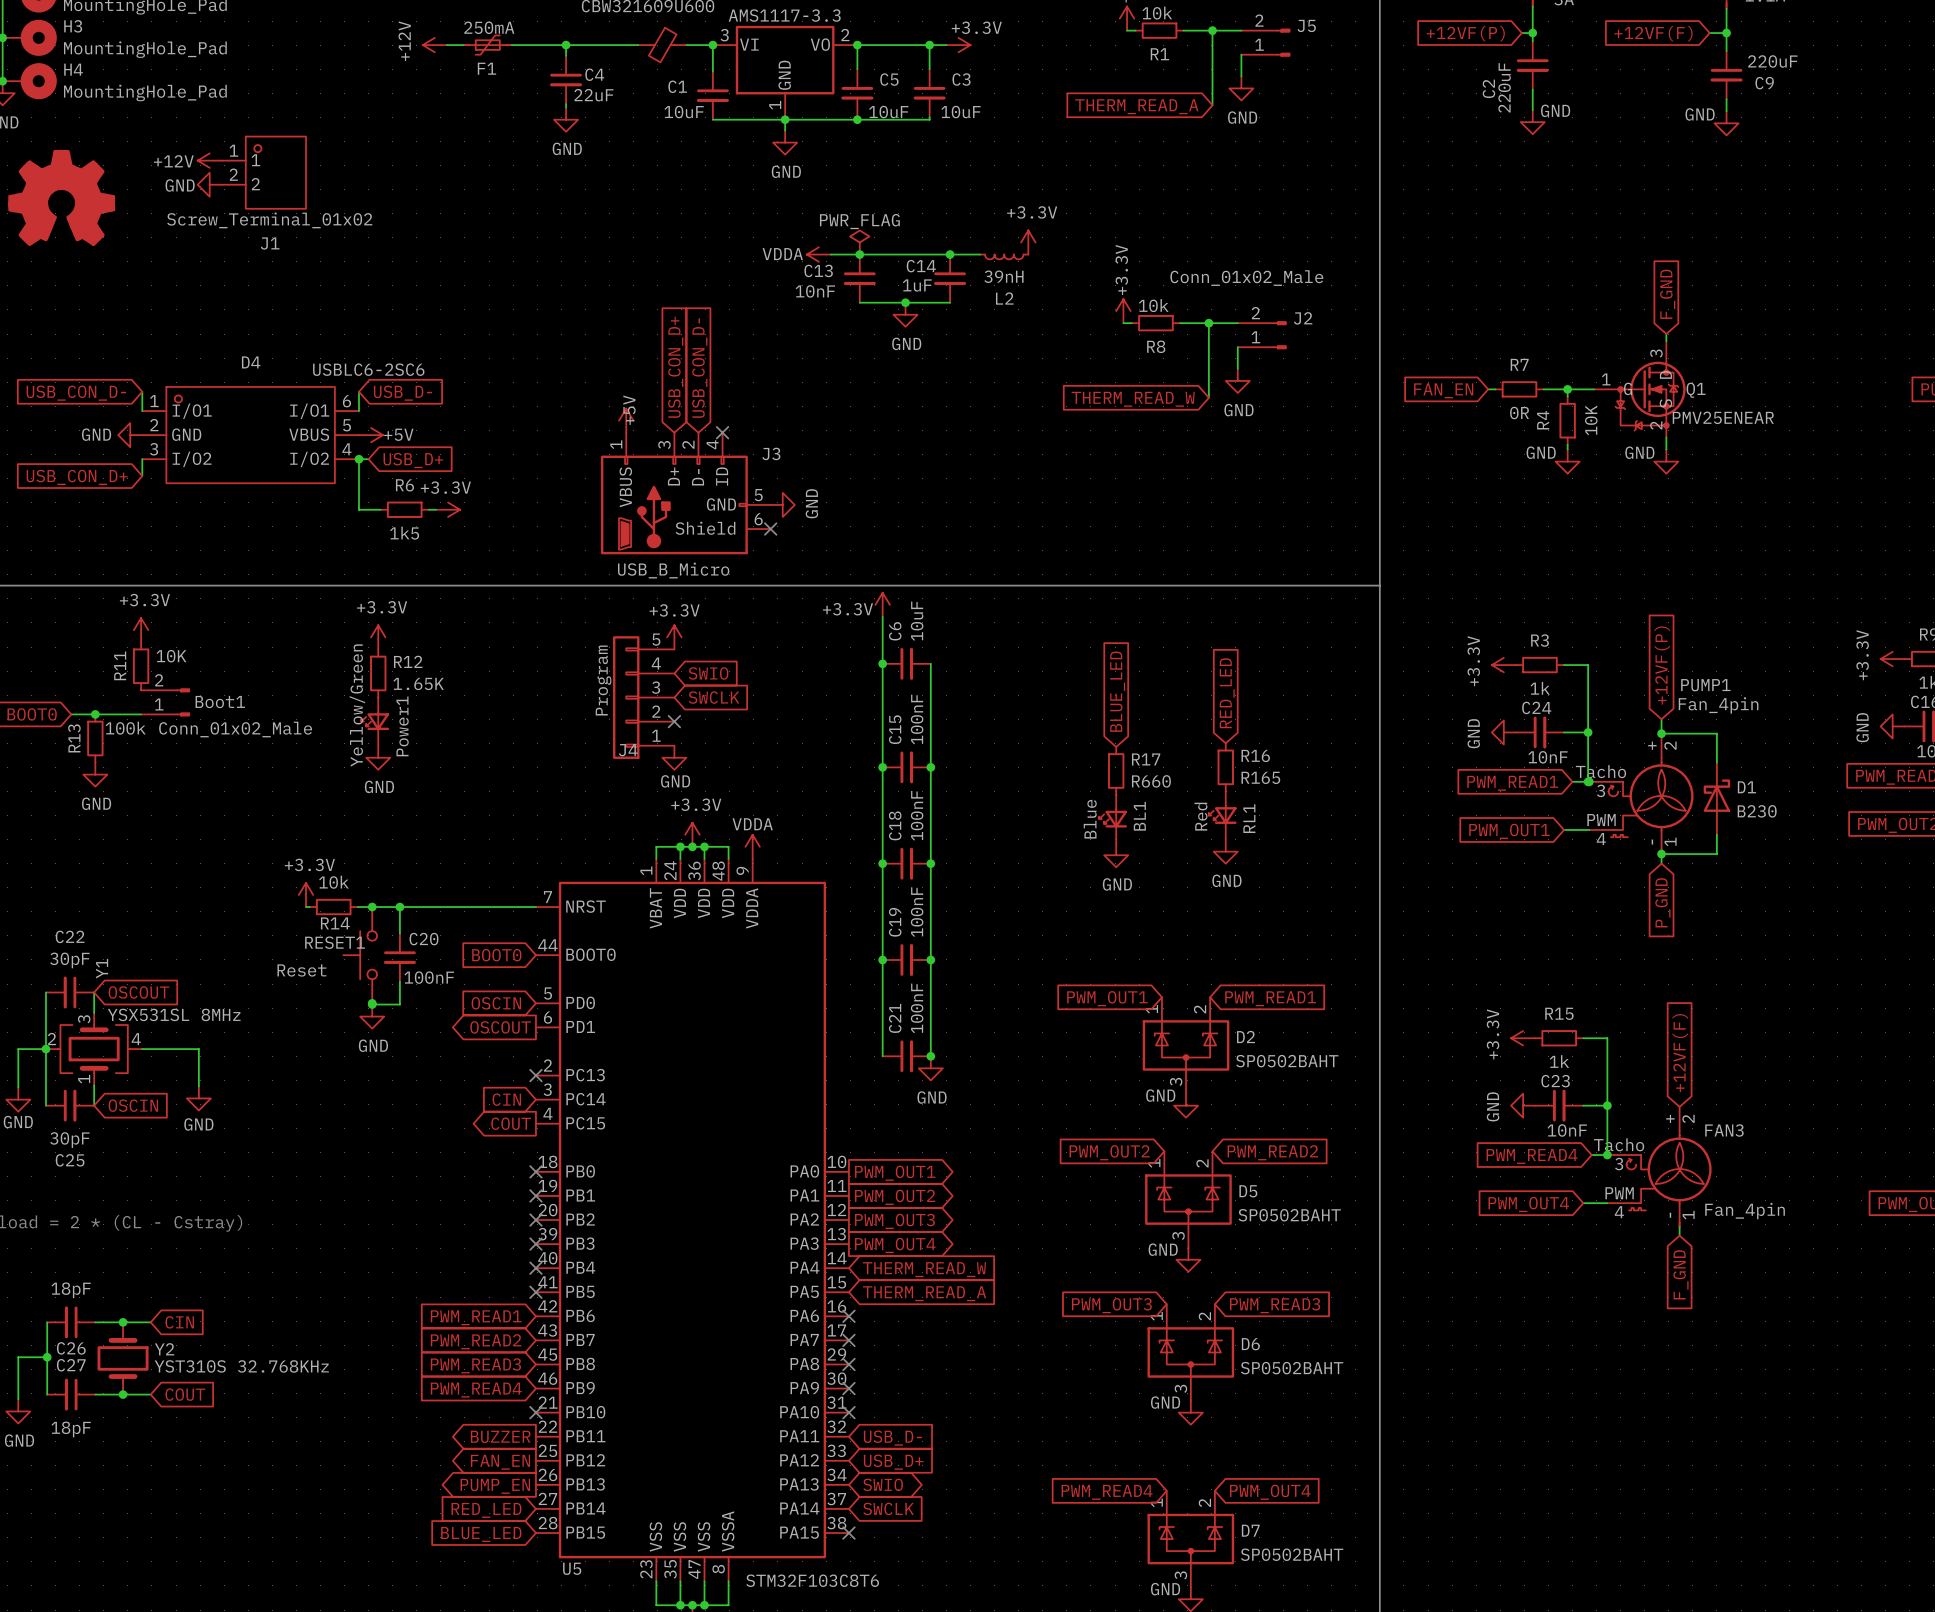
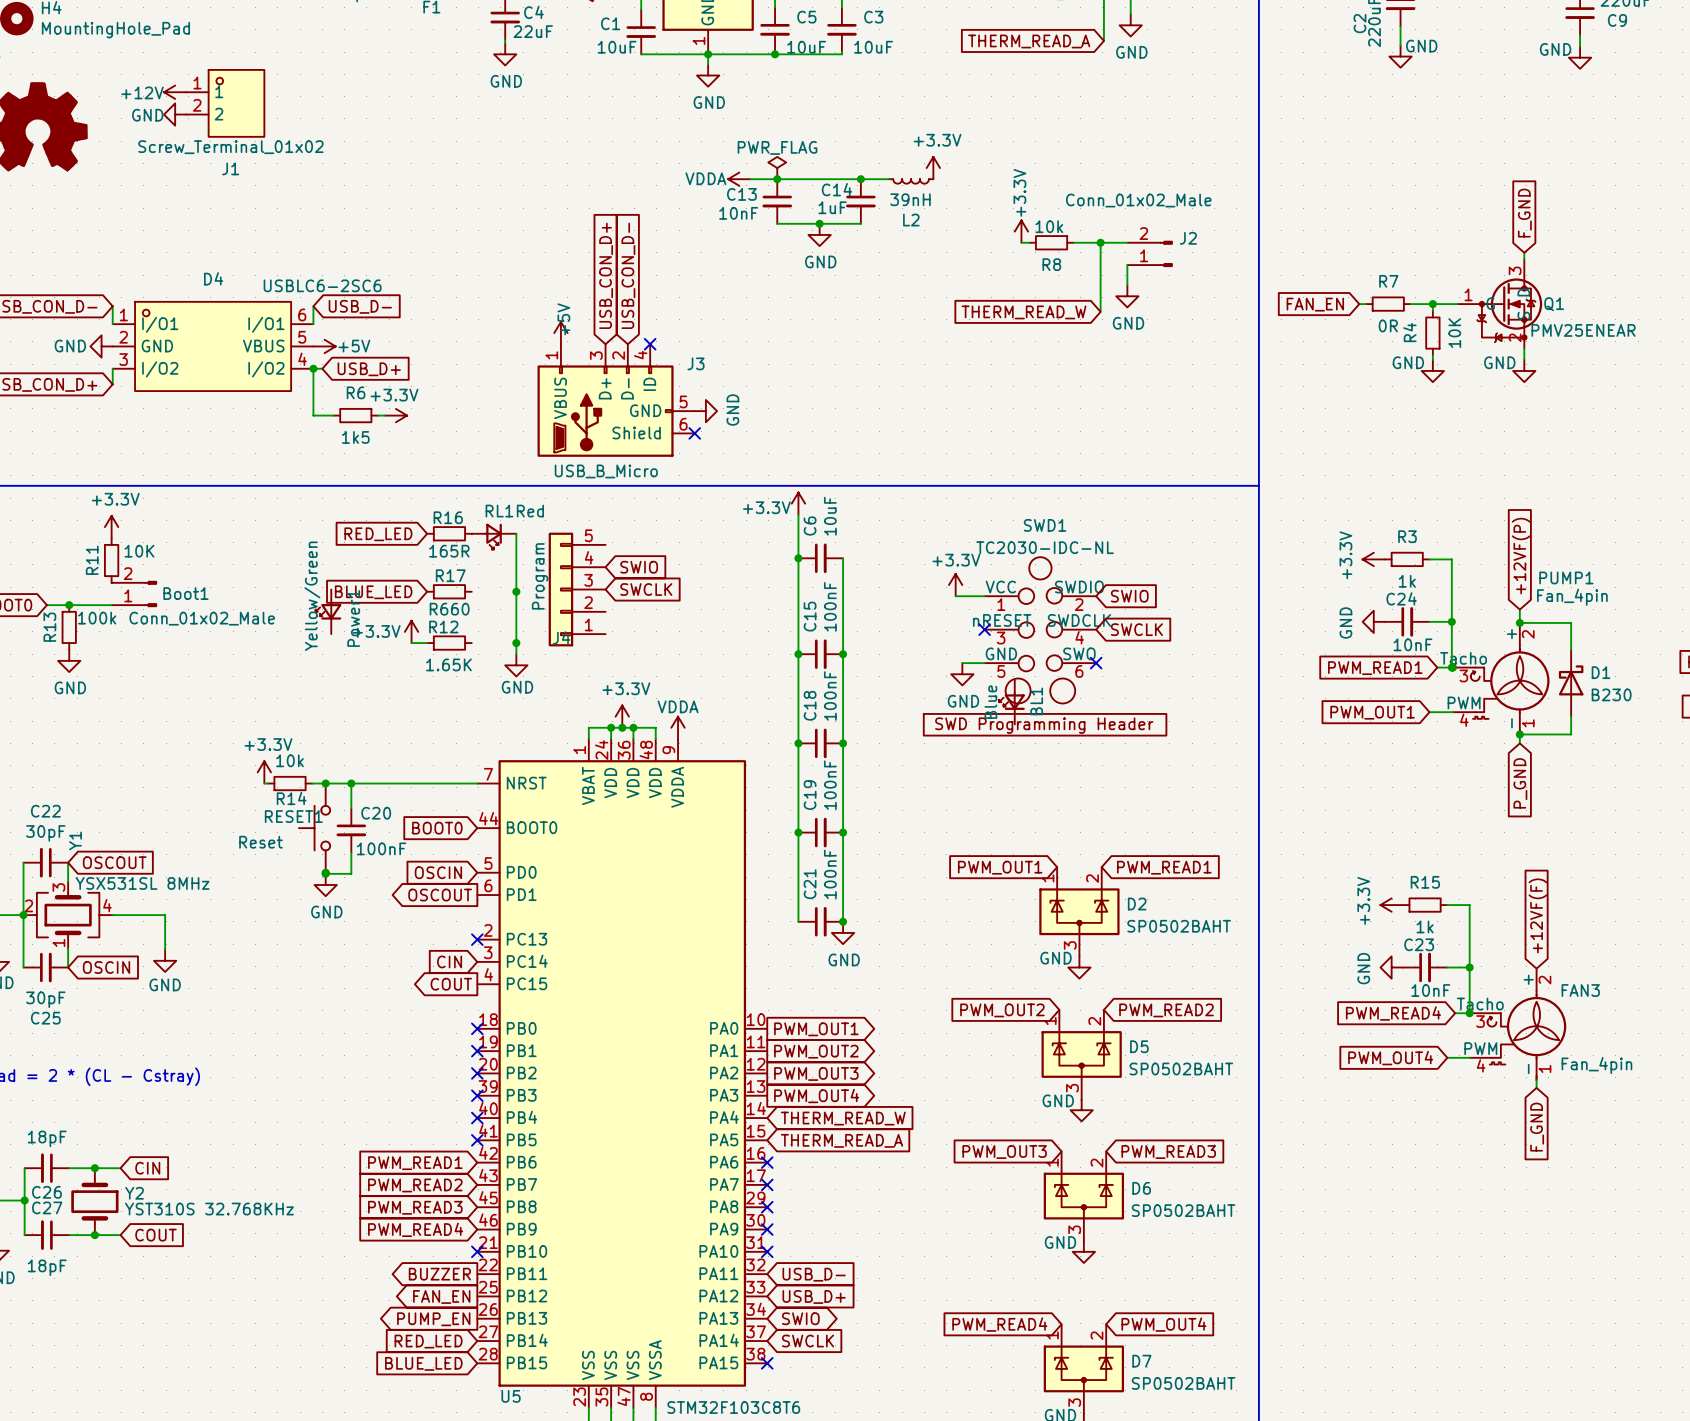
power symbol: +3.3V (378, 637) -> none
wire: none -> (516, 533) (516, 654)
power symbol: +3.3V (674, 637) -> none
global label: none -> RED_LED (378, 534)
R12 name position: R12 (408, 661) -> R12 (443, 627)
R12 rotation: 0° (378, 673) -> 90° clockwise (449, 643)
R12 position: (378, 673) -> (449, 643)
R12 value position: 1.65K (418, 683) -> 1.65K (448, 664)
global label: BLUE_LED (1117, 691) -> none
power symbol: none -> +3.3V (955, 585)
global label: RED_LED (1227, 693) -> none
junction: none -> (516, 591)
global label: none -> BLUE_LED (373, 592)
wire: none -> (955, 596) (984, 596)
global label: none -> SWIO (1129, 596)
no-connect mark: (674, 721) -> none
no-connect mark: none -> (984, 629)
global label: none -> SWCLK (1136, 629)
power symbol: none -> +3.3V (411, 631)
wire: none -> (411, 643) (427, 643)
junction: none -> (516, 643)
R16 name position: R16 (1255, 755) -> R16 (448, 517)
power symbol: GND (378, 757) -> none
power symbol position: GND (674, 757) -> GND (516, 665)
SWD1: none -> (1045, 646)
R17 name position: R17 (1146, 759) -> R17 (450, 575)
R16 rotation: 0° (1225, 767) -> 90° clockwise (449, 533)
R16 position: (1225, 767) -> (449, 533)
R17 rotation: 0° (1116, 770) -> 90° clockwise (449, 591)
R17 position: (1116, 770) -> (449, 591)
wire: none -> (962, 663) (984, 663)
no-connect mark: none -> (1096, 663)
R16 value: R165 (1260, 777) -> 165R (449, 551)
R17 value position: R660 (1151, 781) -> R660 (449, 609)
RL1 rotation: 0° (1222, 814) -> 90° counterclockwise (493, 536)
RL1 position: (1222, 815) -> (494, 536)
RL1 value position: Red (1200, 816) -> Red (530, 511)
power symbol: GND (1225, 851) -> none
power symbol position: GND (1116, 855) -> GND (962, 674)

